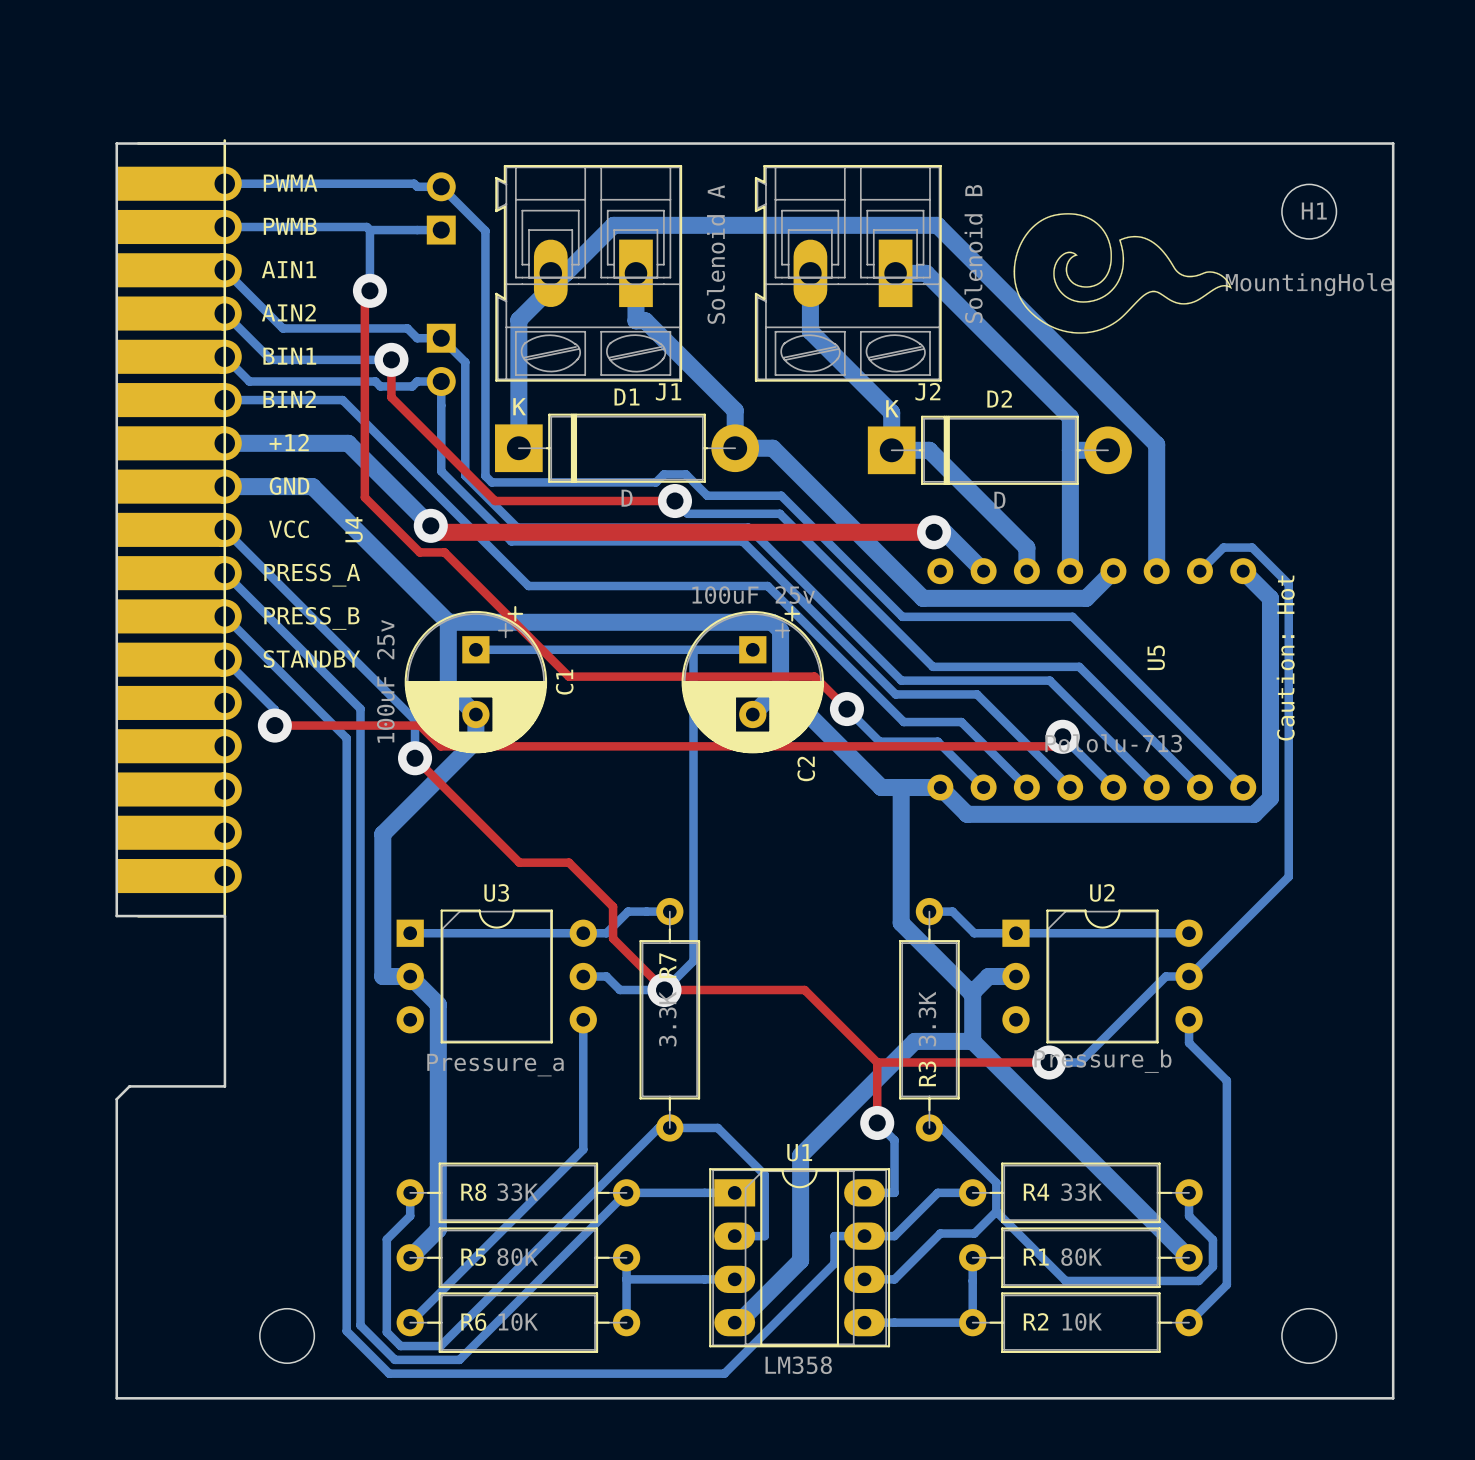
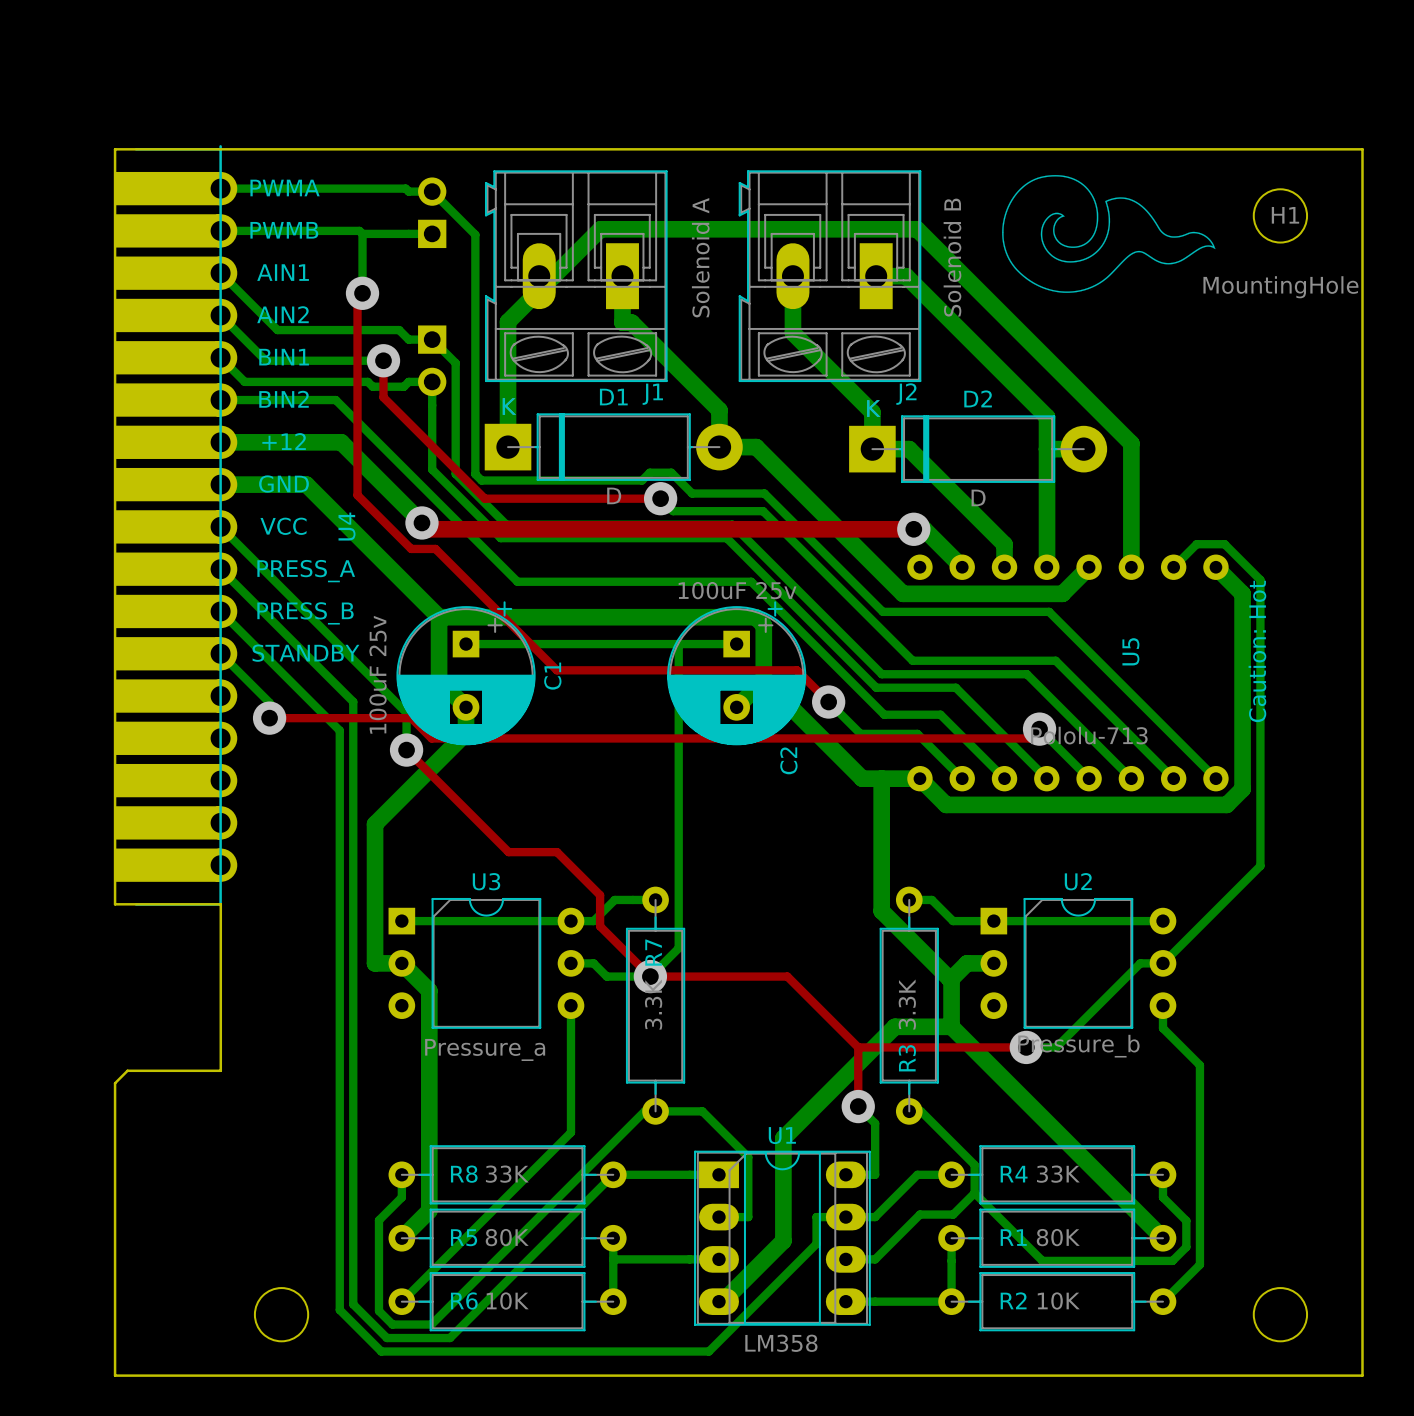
drawing position: (1122, 273) -> (1108, 233)

